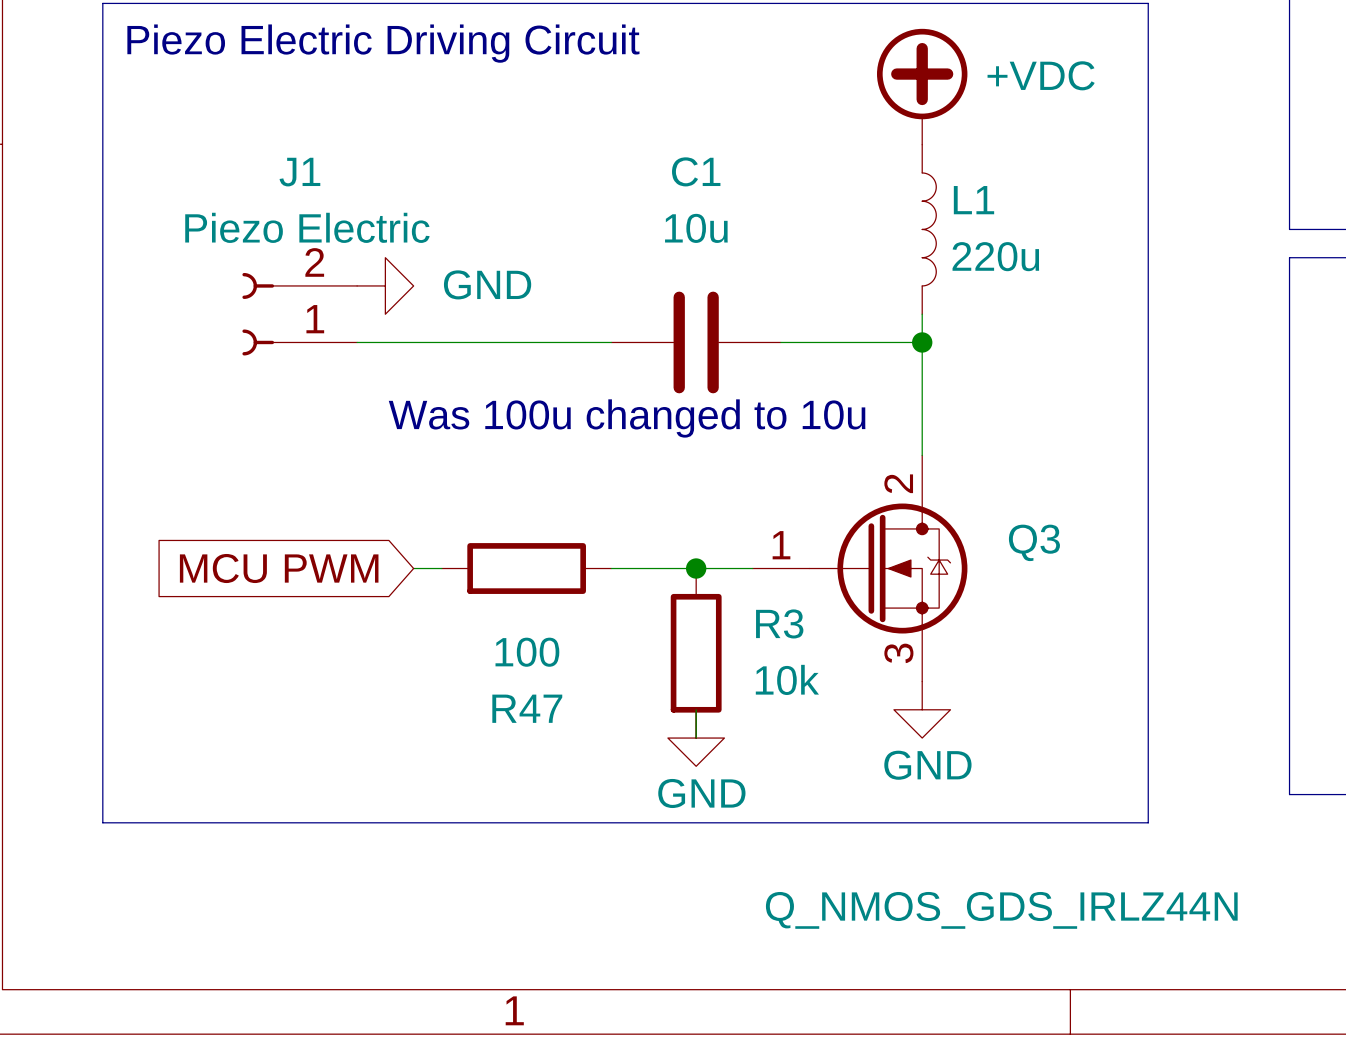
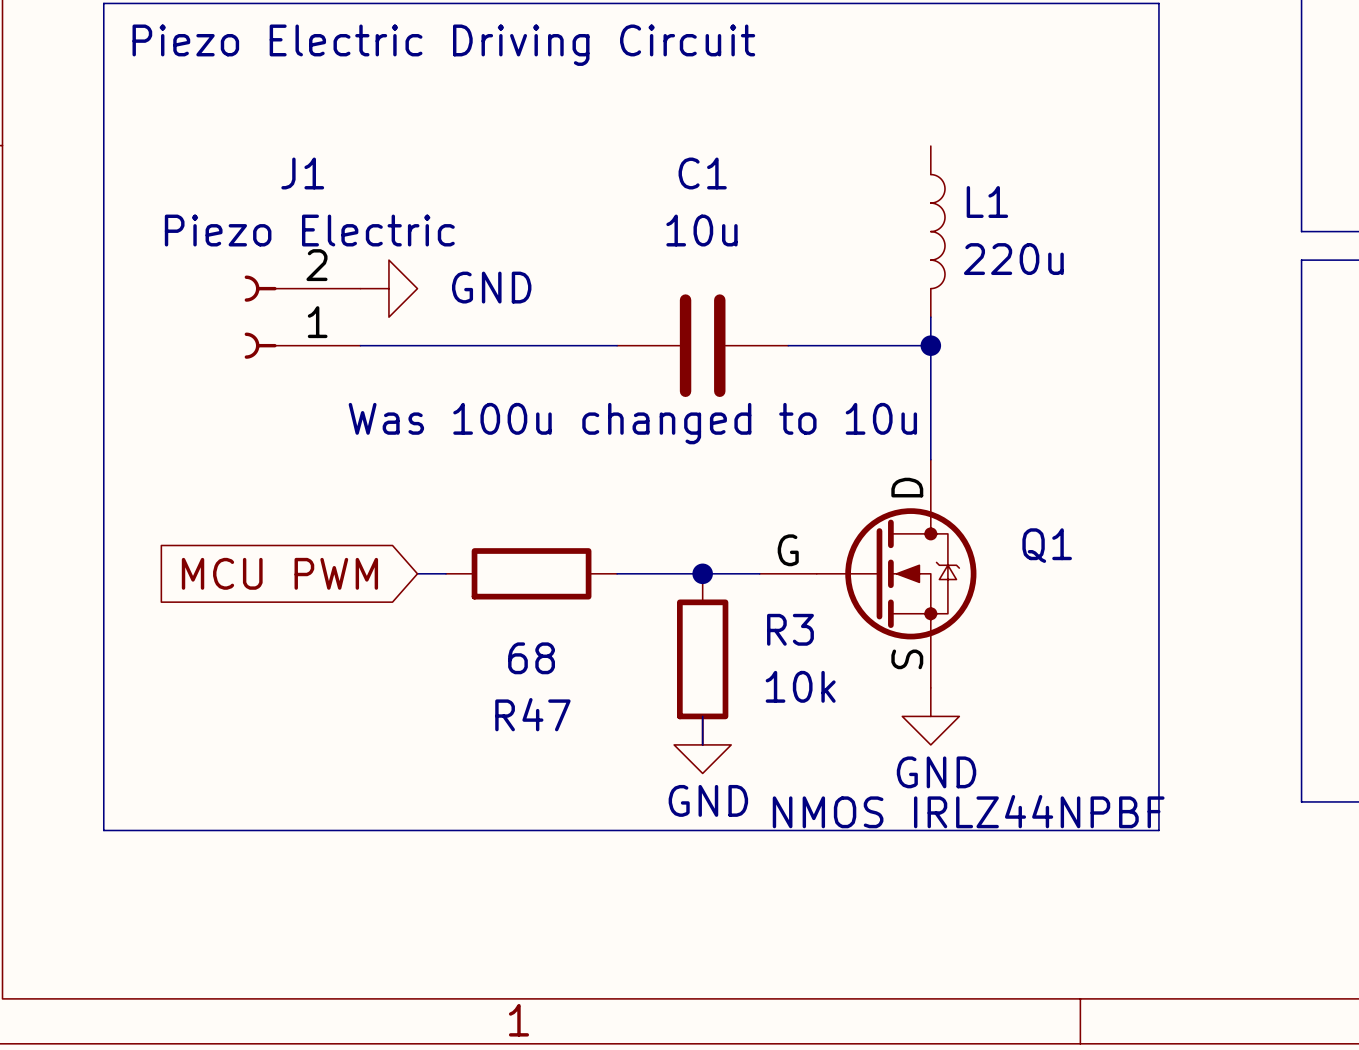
power symbol: +VDC (922, 86) -> none
Q3: Q_NMOS_GDS_IRLZ44N (860, 568) -> none
Q1: none -> NMOS IRLZ44NPBF (868, 573)
R47 value: 100 (527, 652) -> 68 (531, 658)

